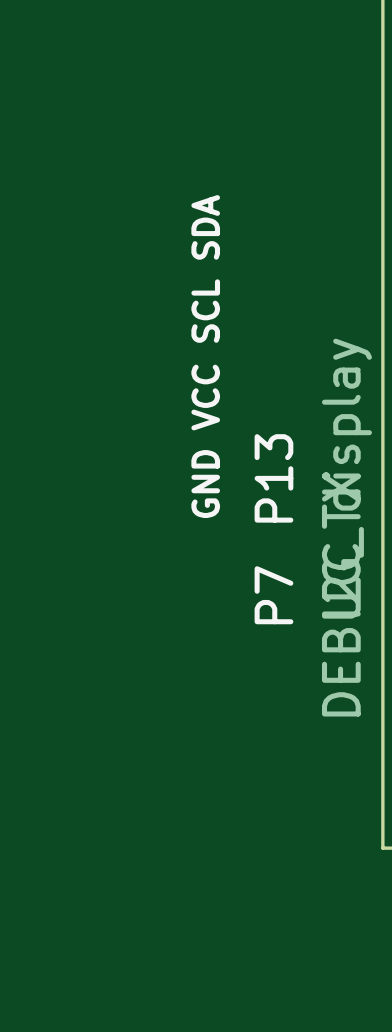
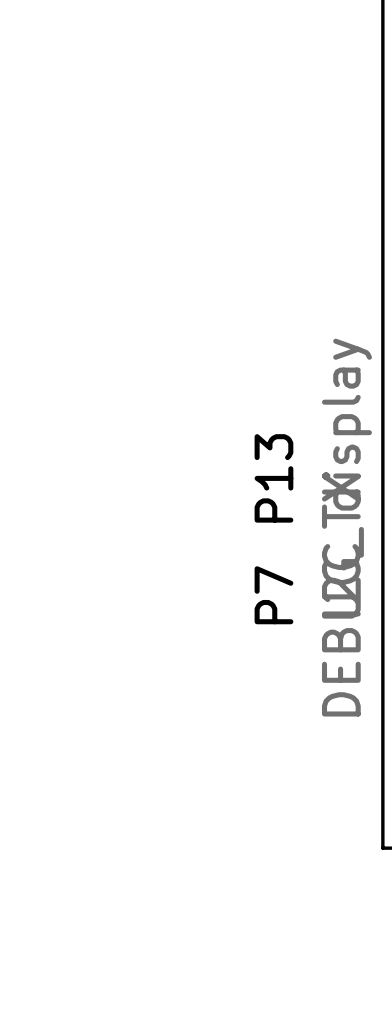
text: GND VCC SCL SDA (205, 356) -> none

